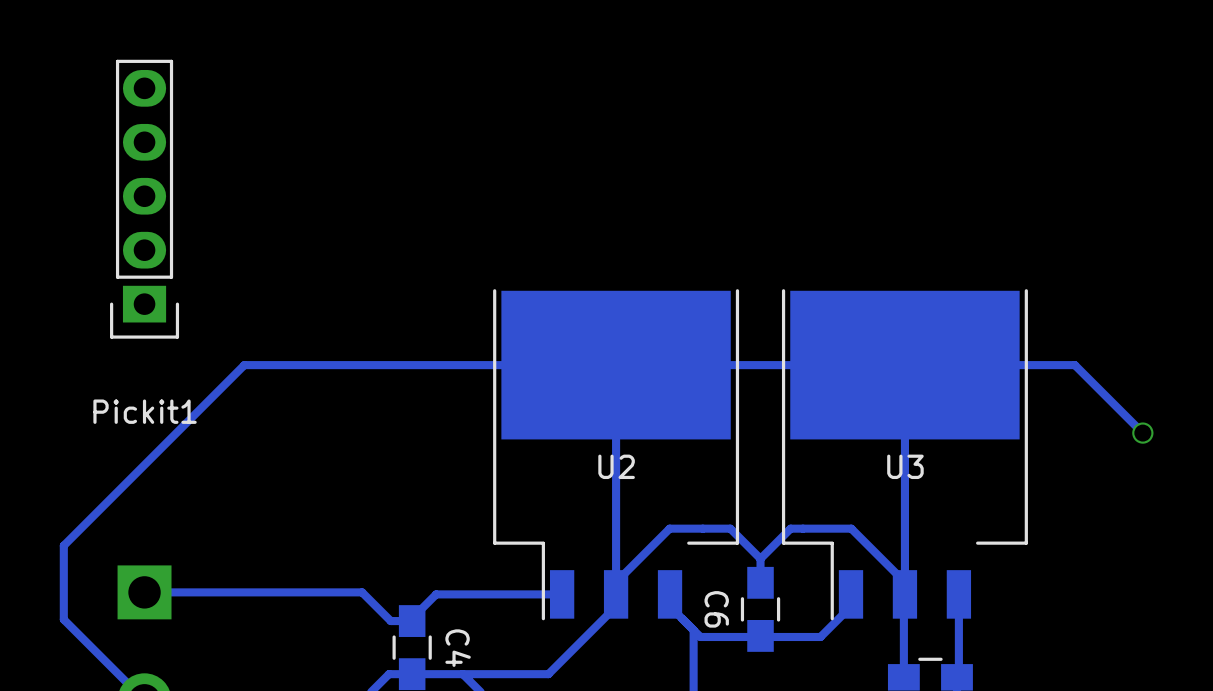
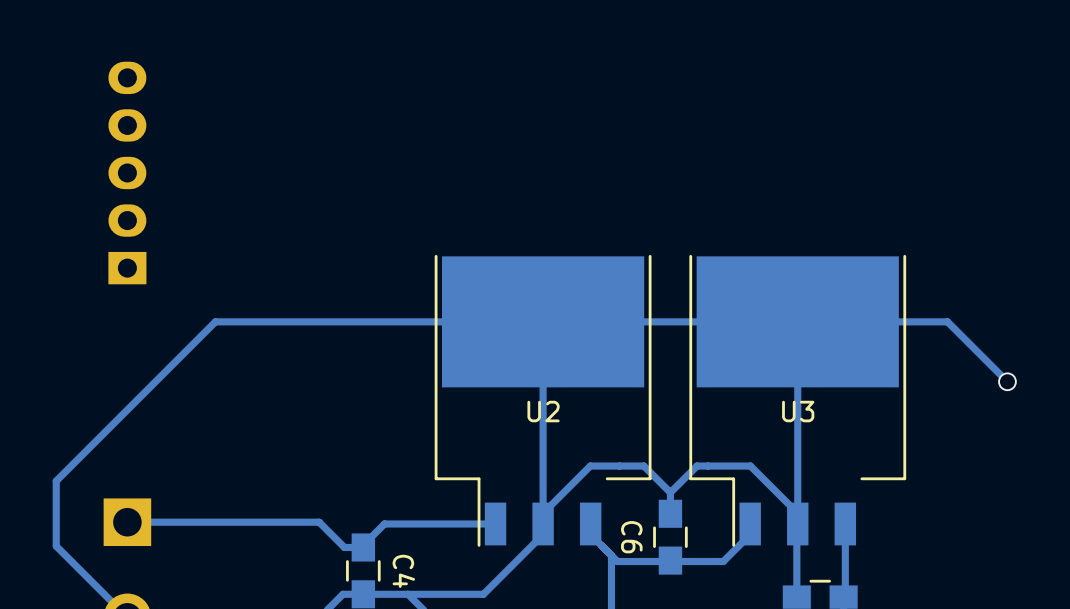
Pickit1 side: bottom (144, 199) -> top (127, 173)

